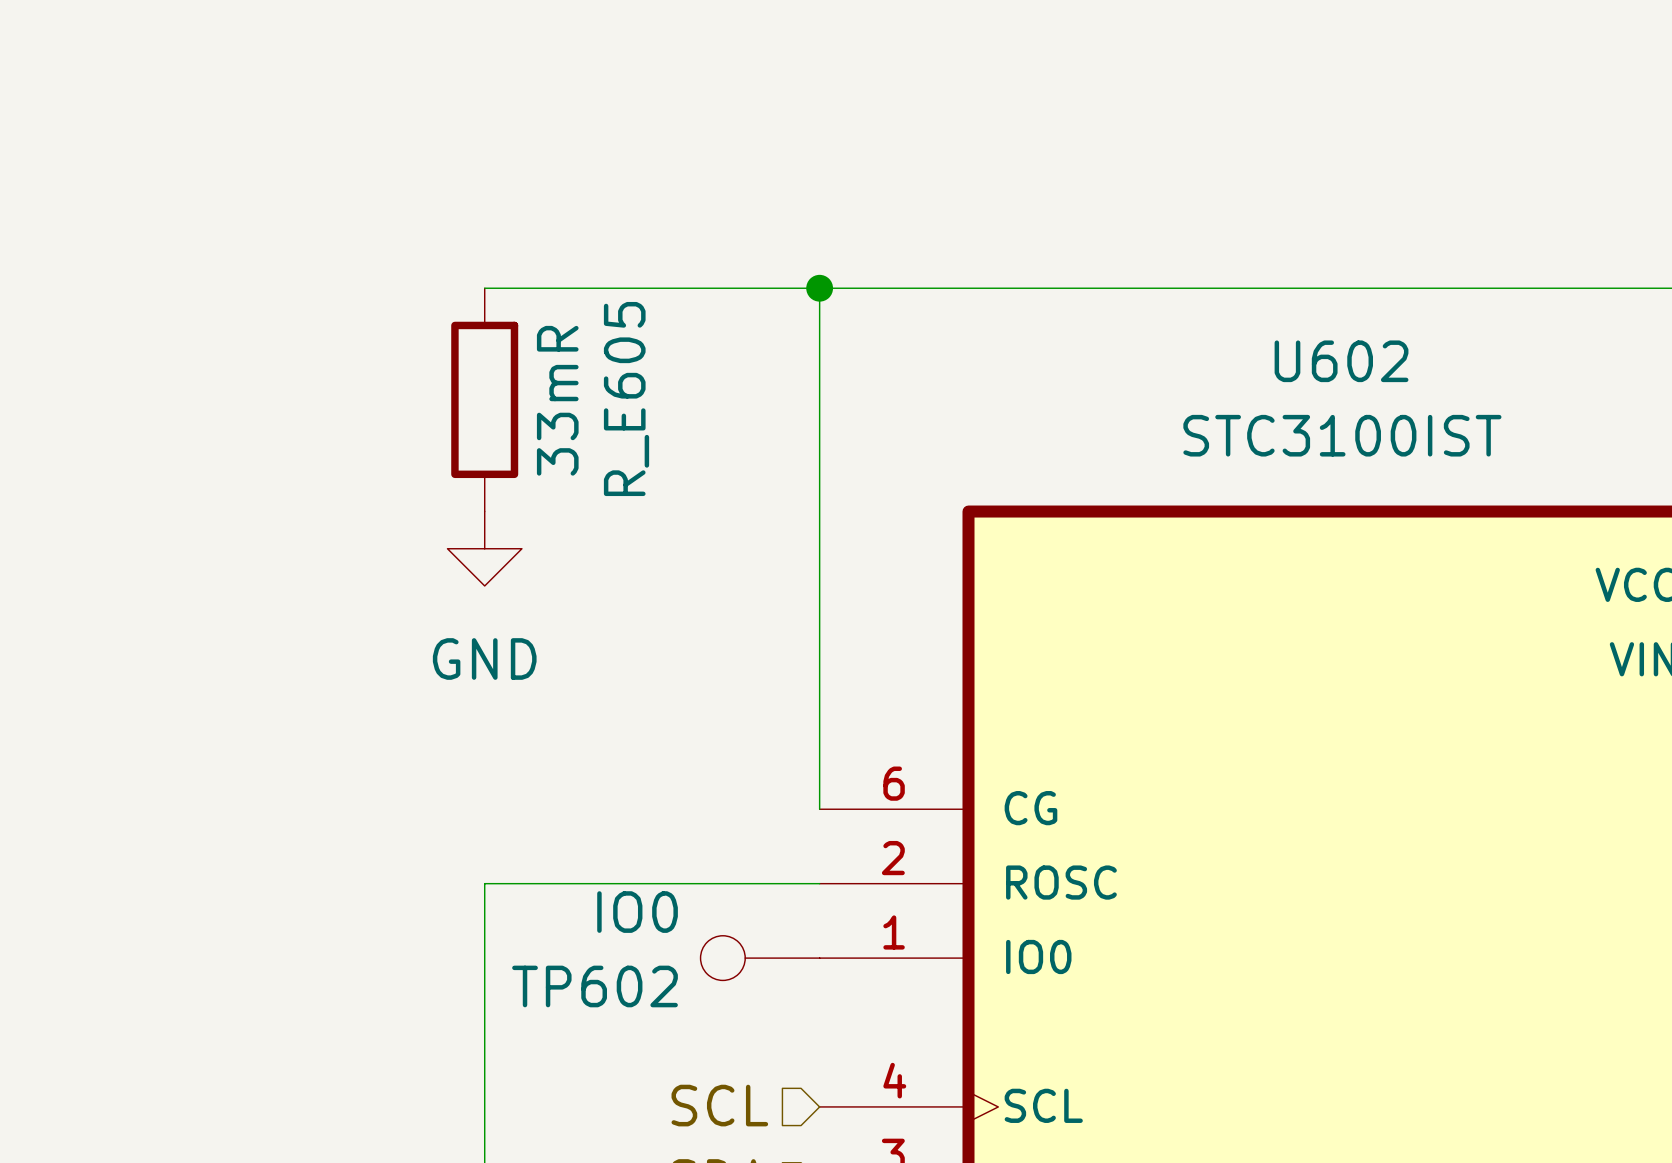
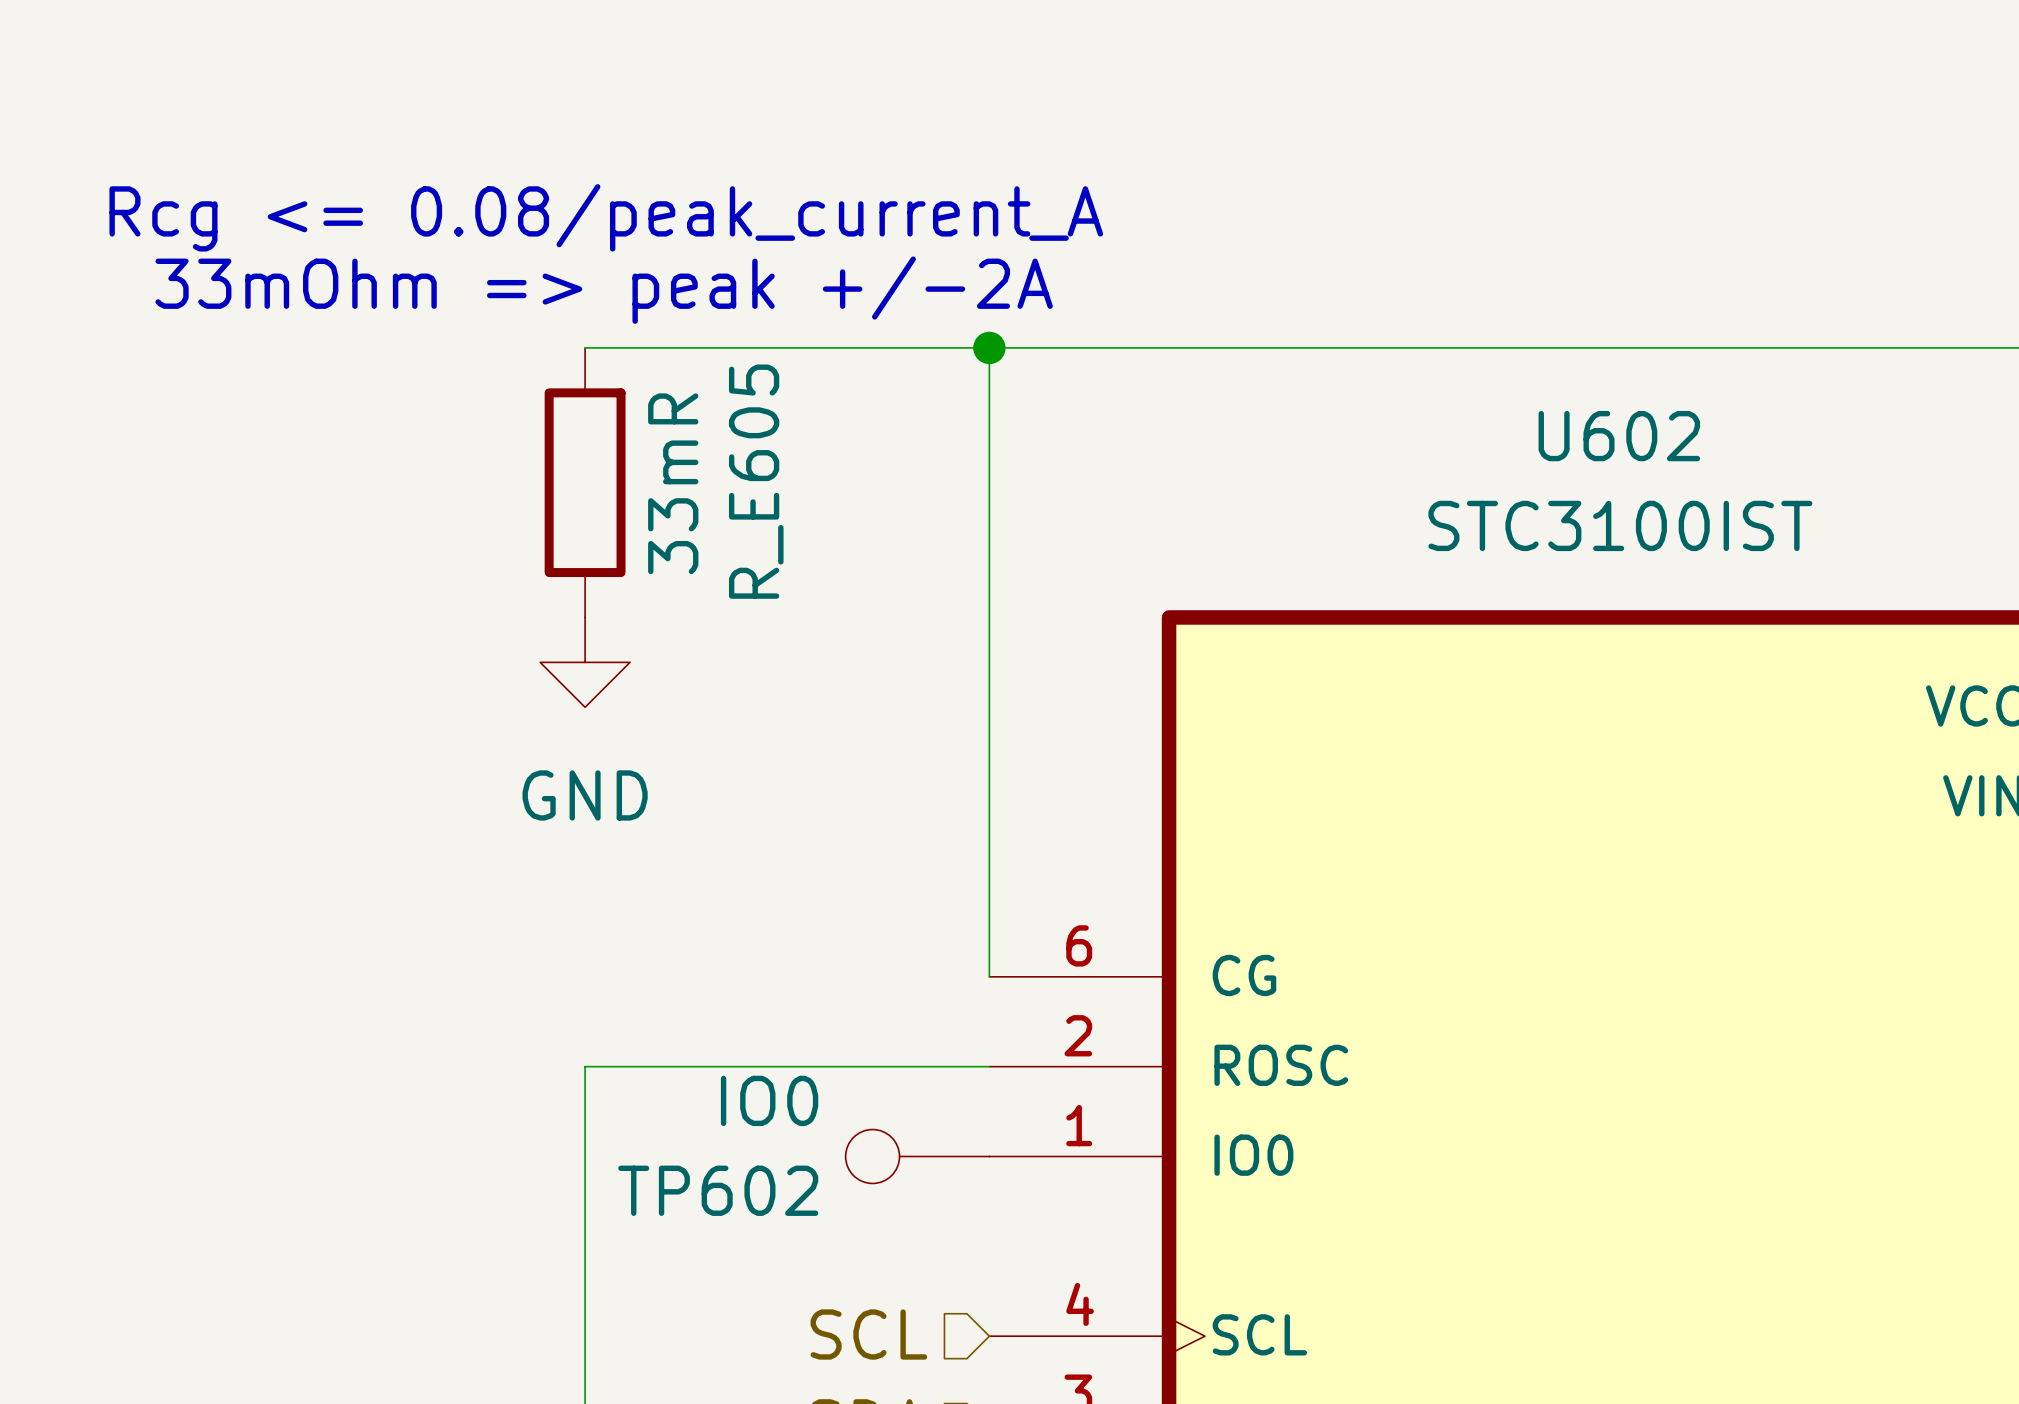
text: none -> Rcg <= 0.08/peak_current_A (606, 217)
text: none -> 33mOhm => peak +/-2A (604, 290)

